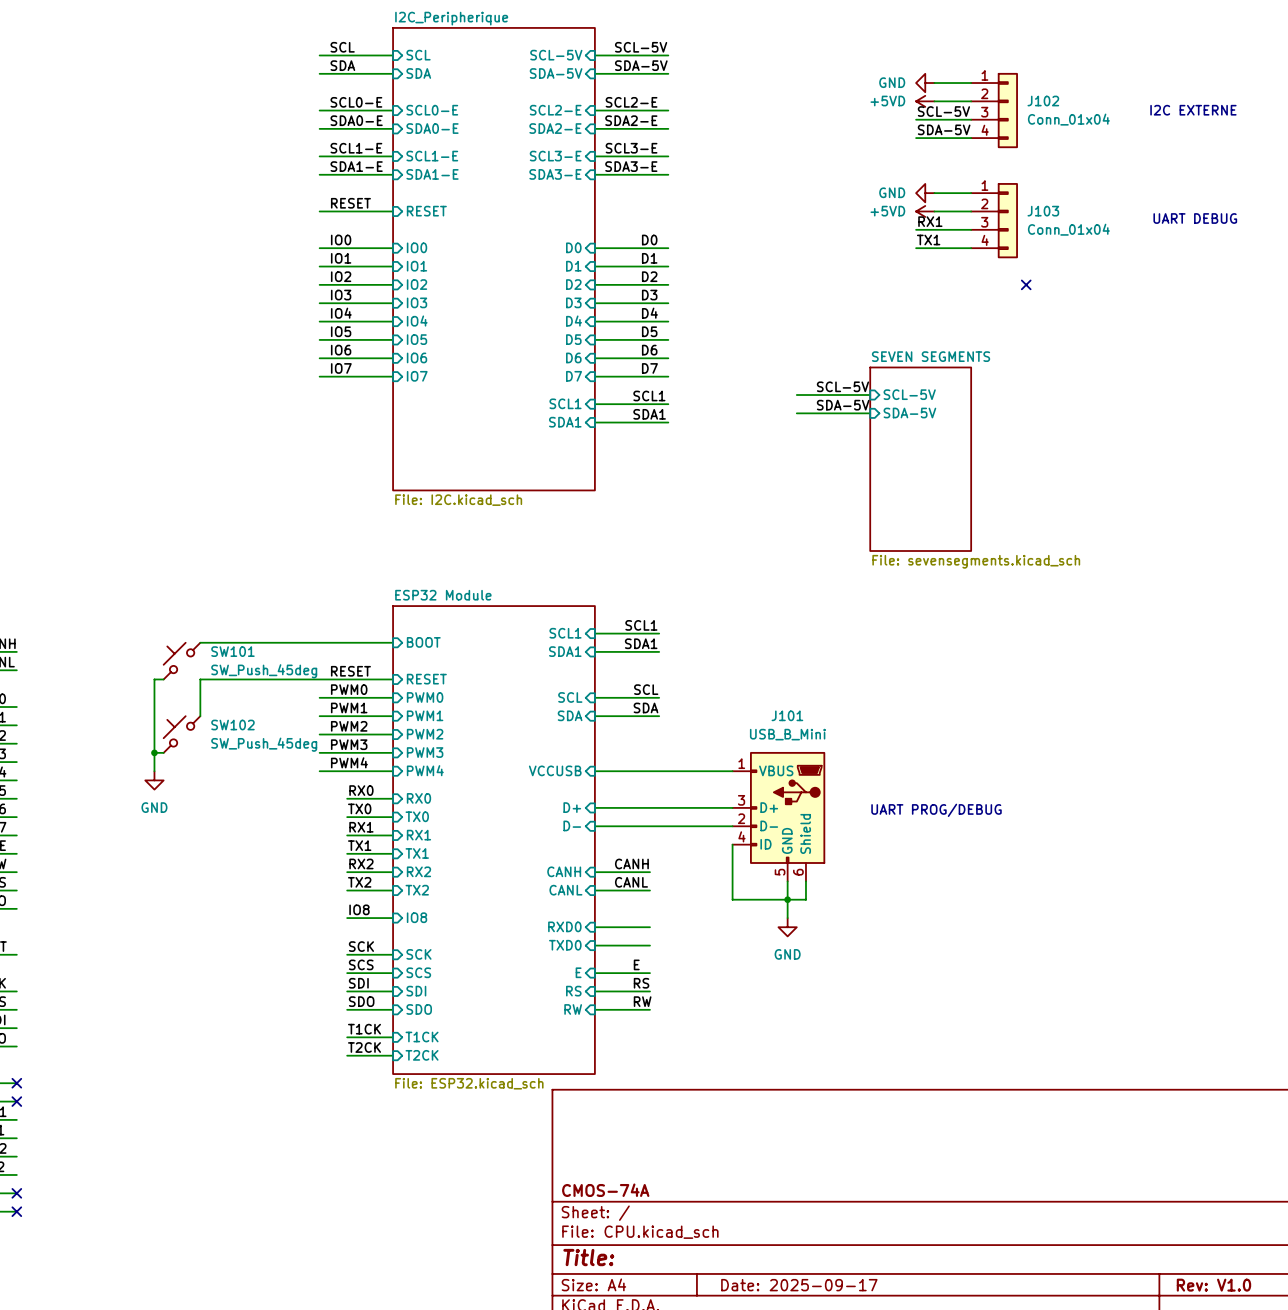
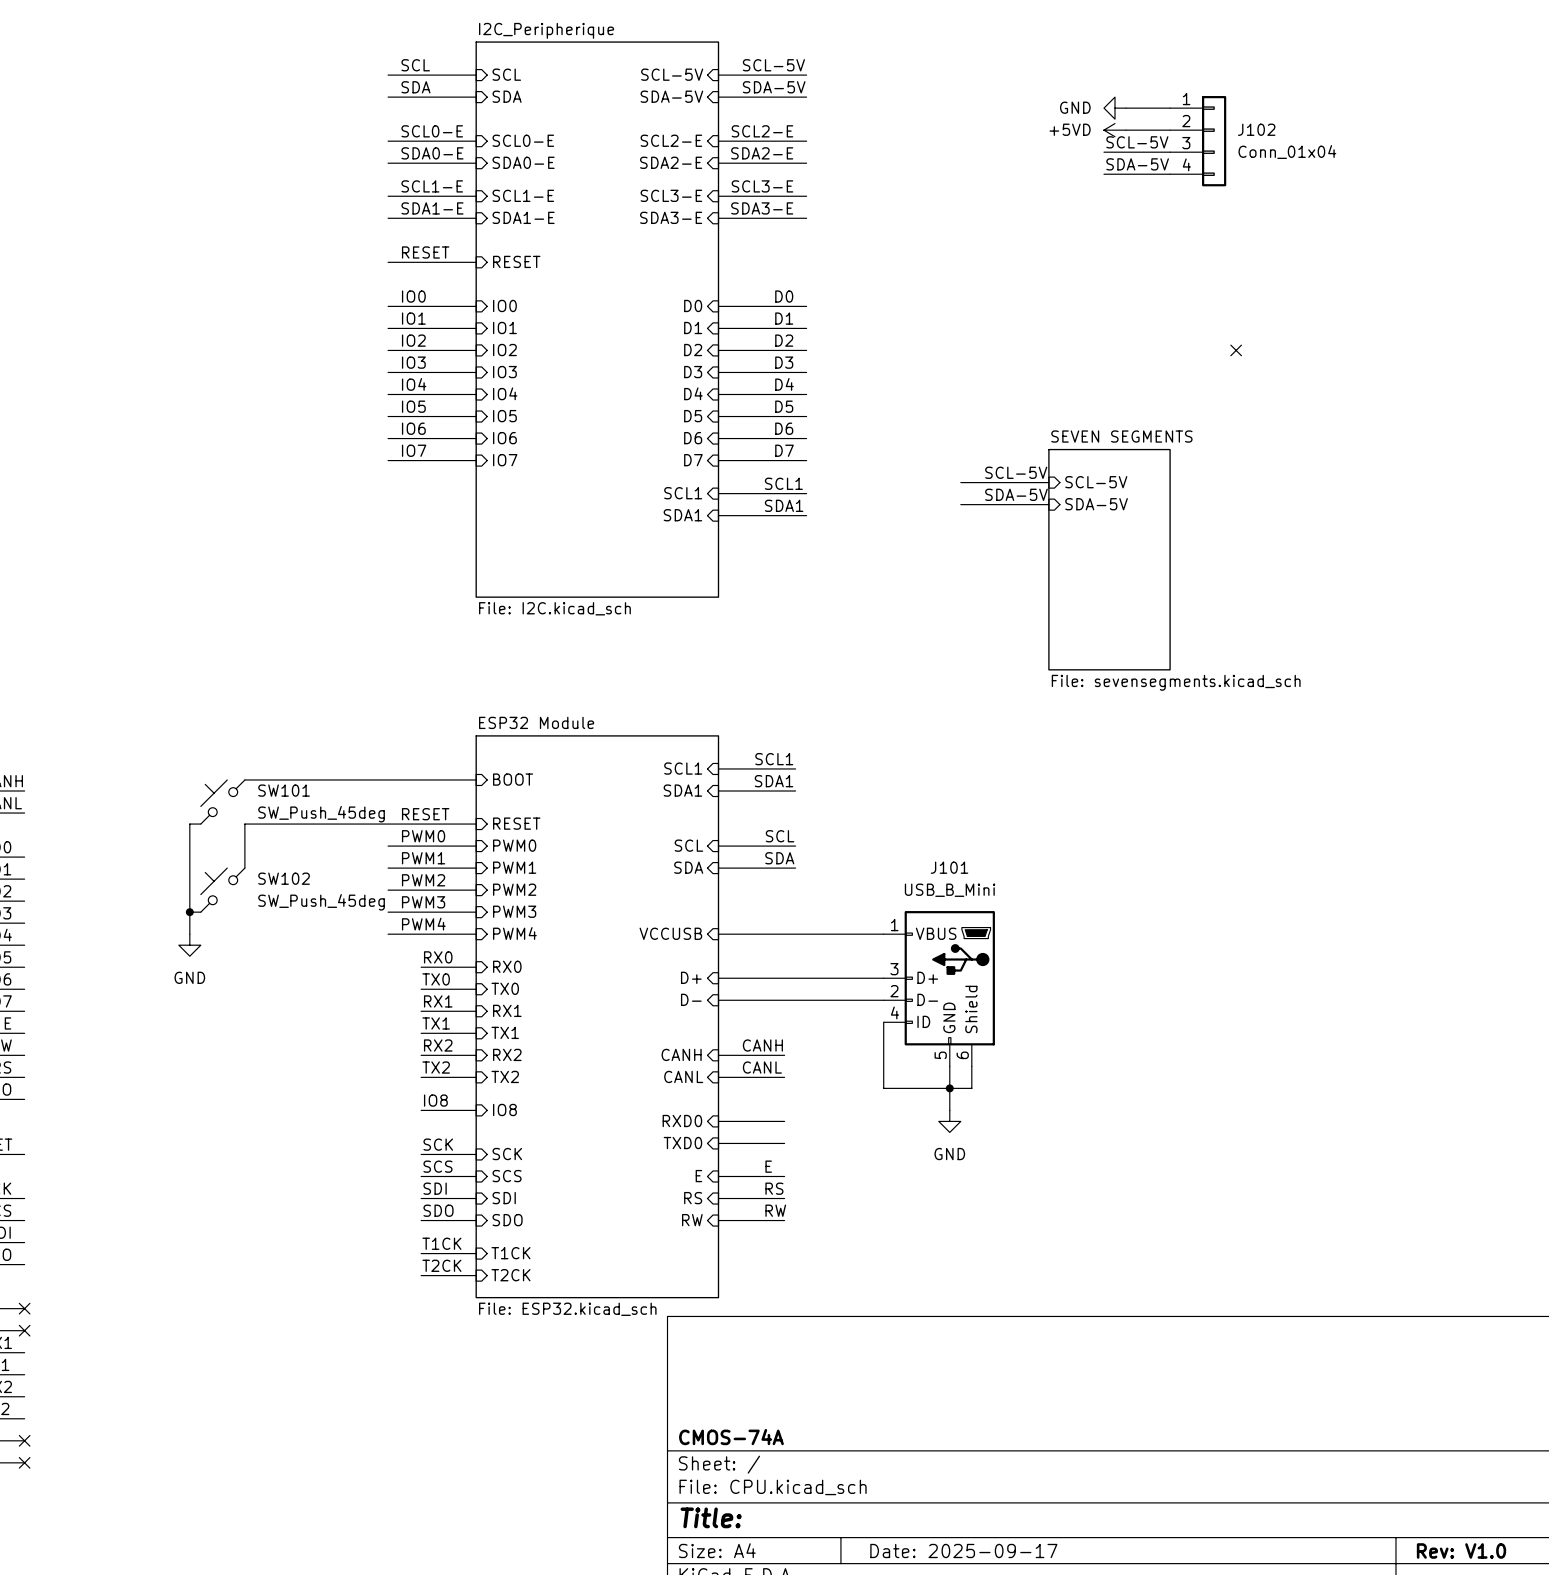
text: I2C EXTERNE (1193, 110) -> none
power symbol: GND (925, 193) -> none
wire: (934, 193) (971, 193) -> none
power symbol: +5VD (925, 211) -> none
wire: (934, 211) (971, 211) -> none
text: UART DEBUG (1195, 218) -> none
J103: Conn_01x04 (994, 220) -> none
label: RX1 (930, 221) -> none
wire: (916, 229) (971, 229) -> none
label: TX1 (928, 239) -> none
wire: (916, 248) (971, 248) -> none
text: UART PROG/DEBUG (936, 810) -> none

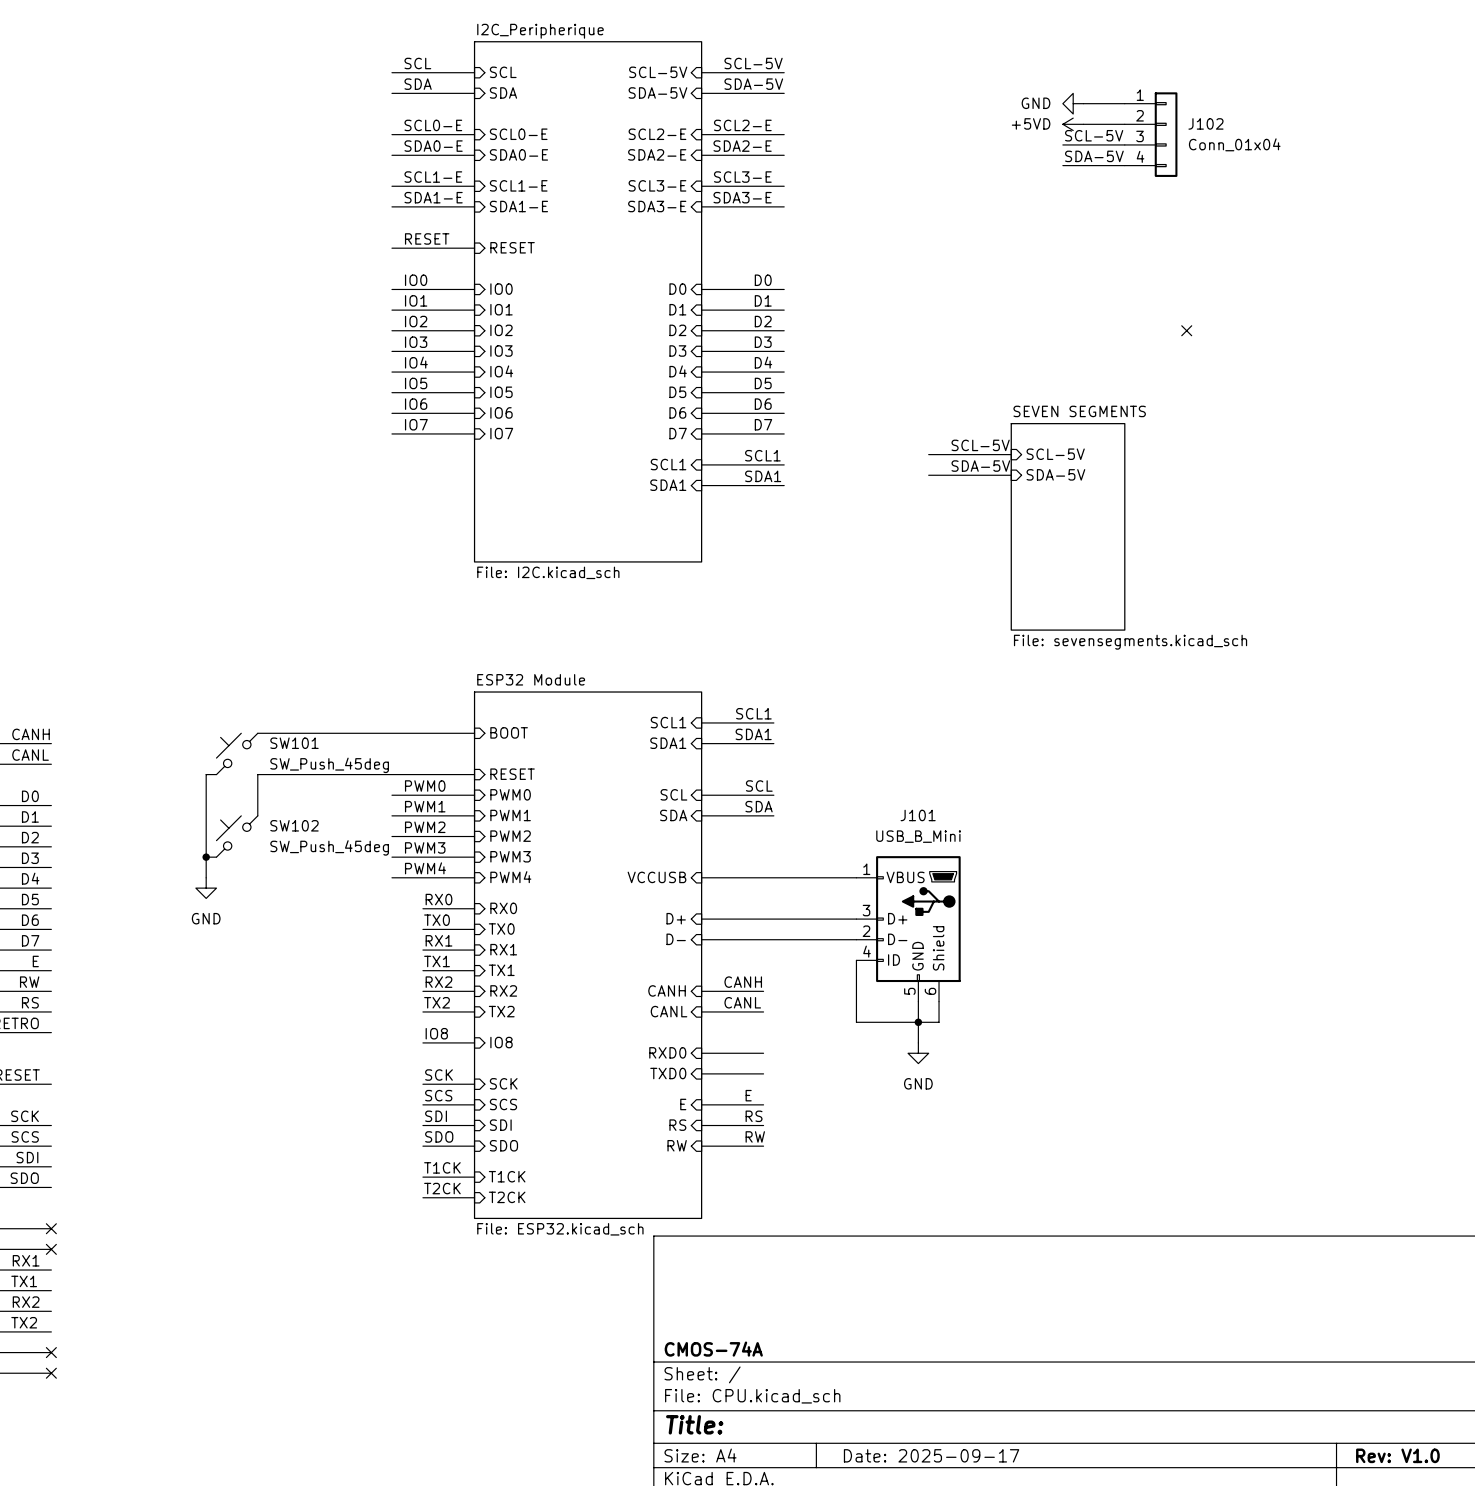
label: RESET (425, 814) -> none

